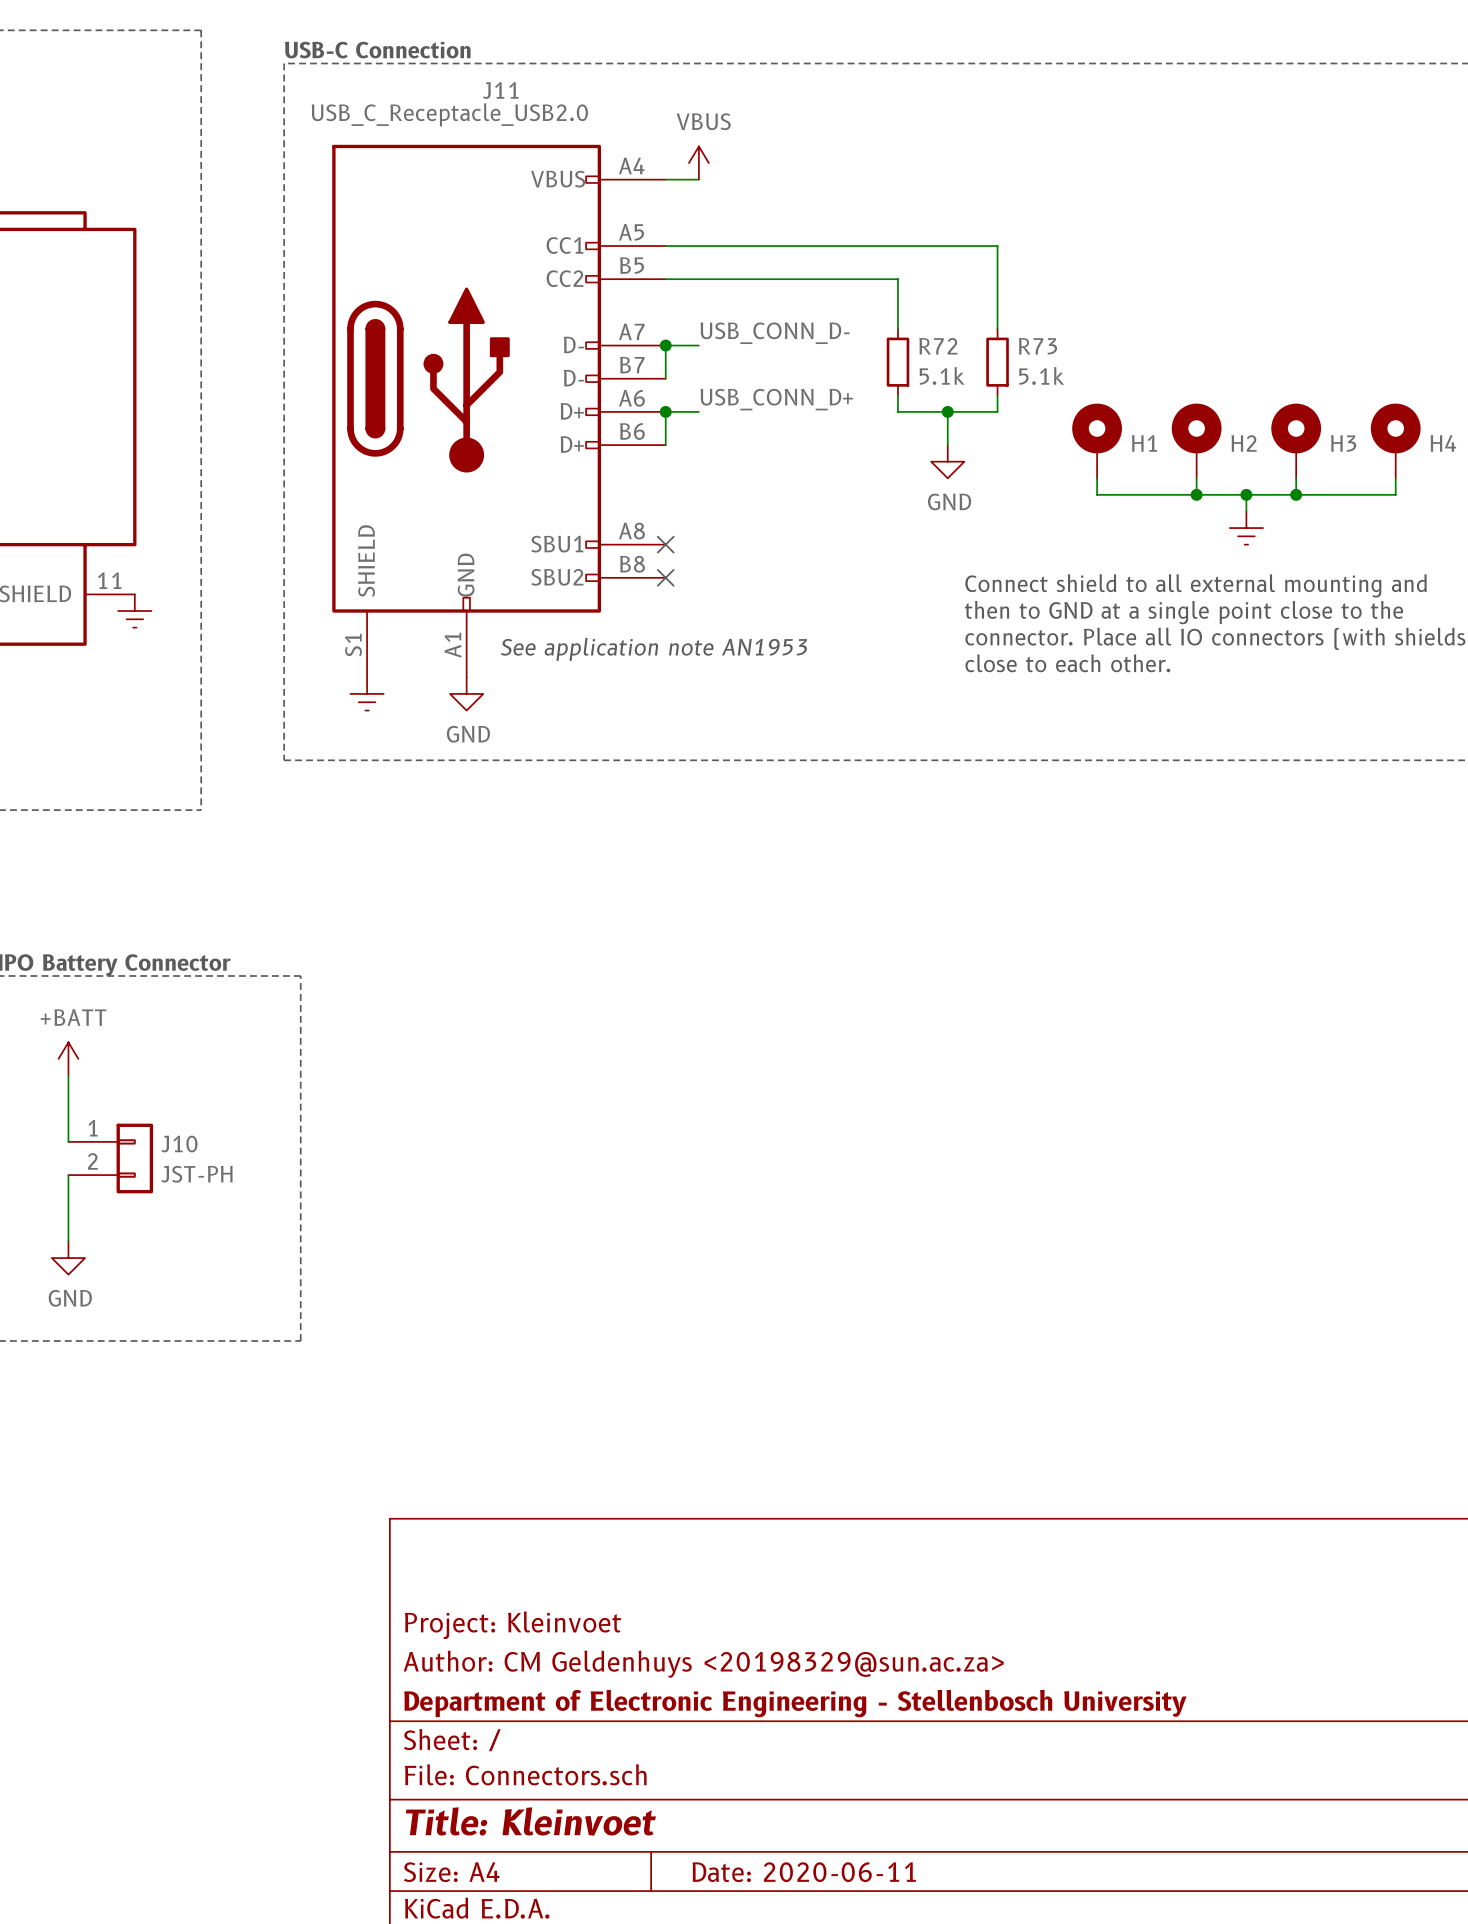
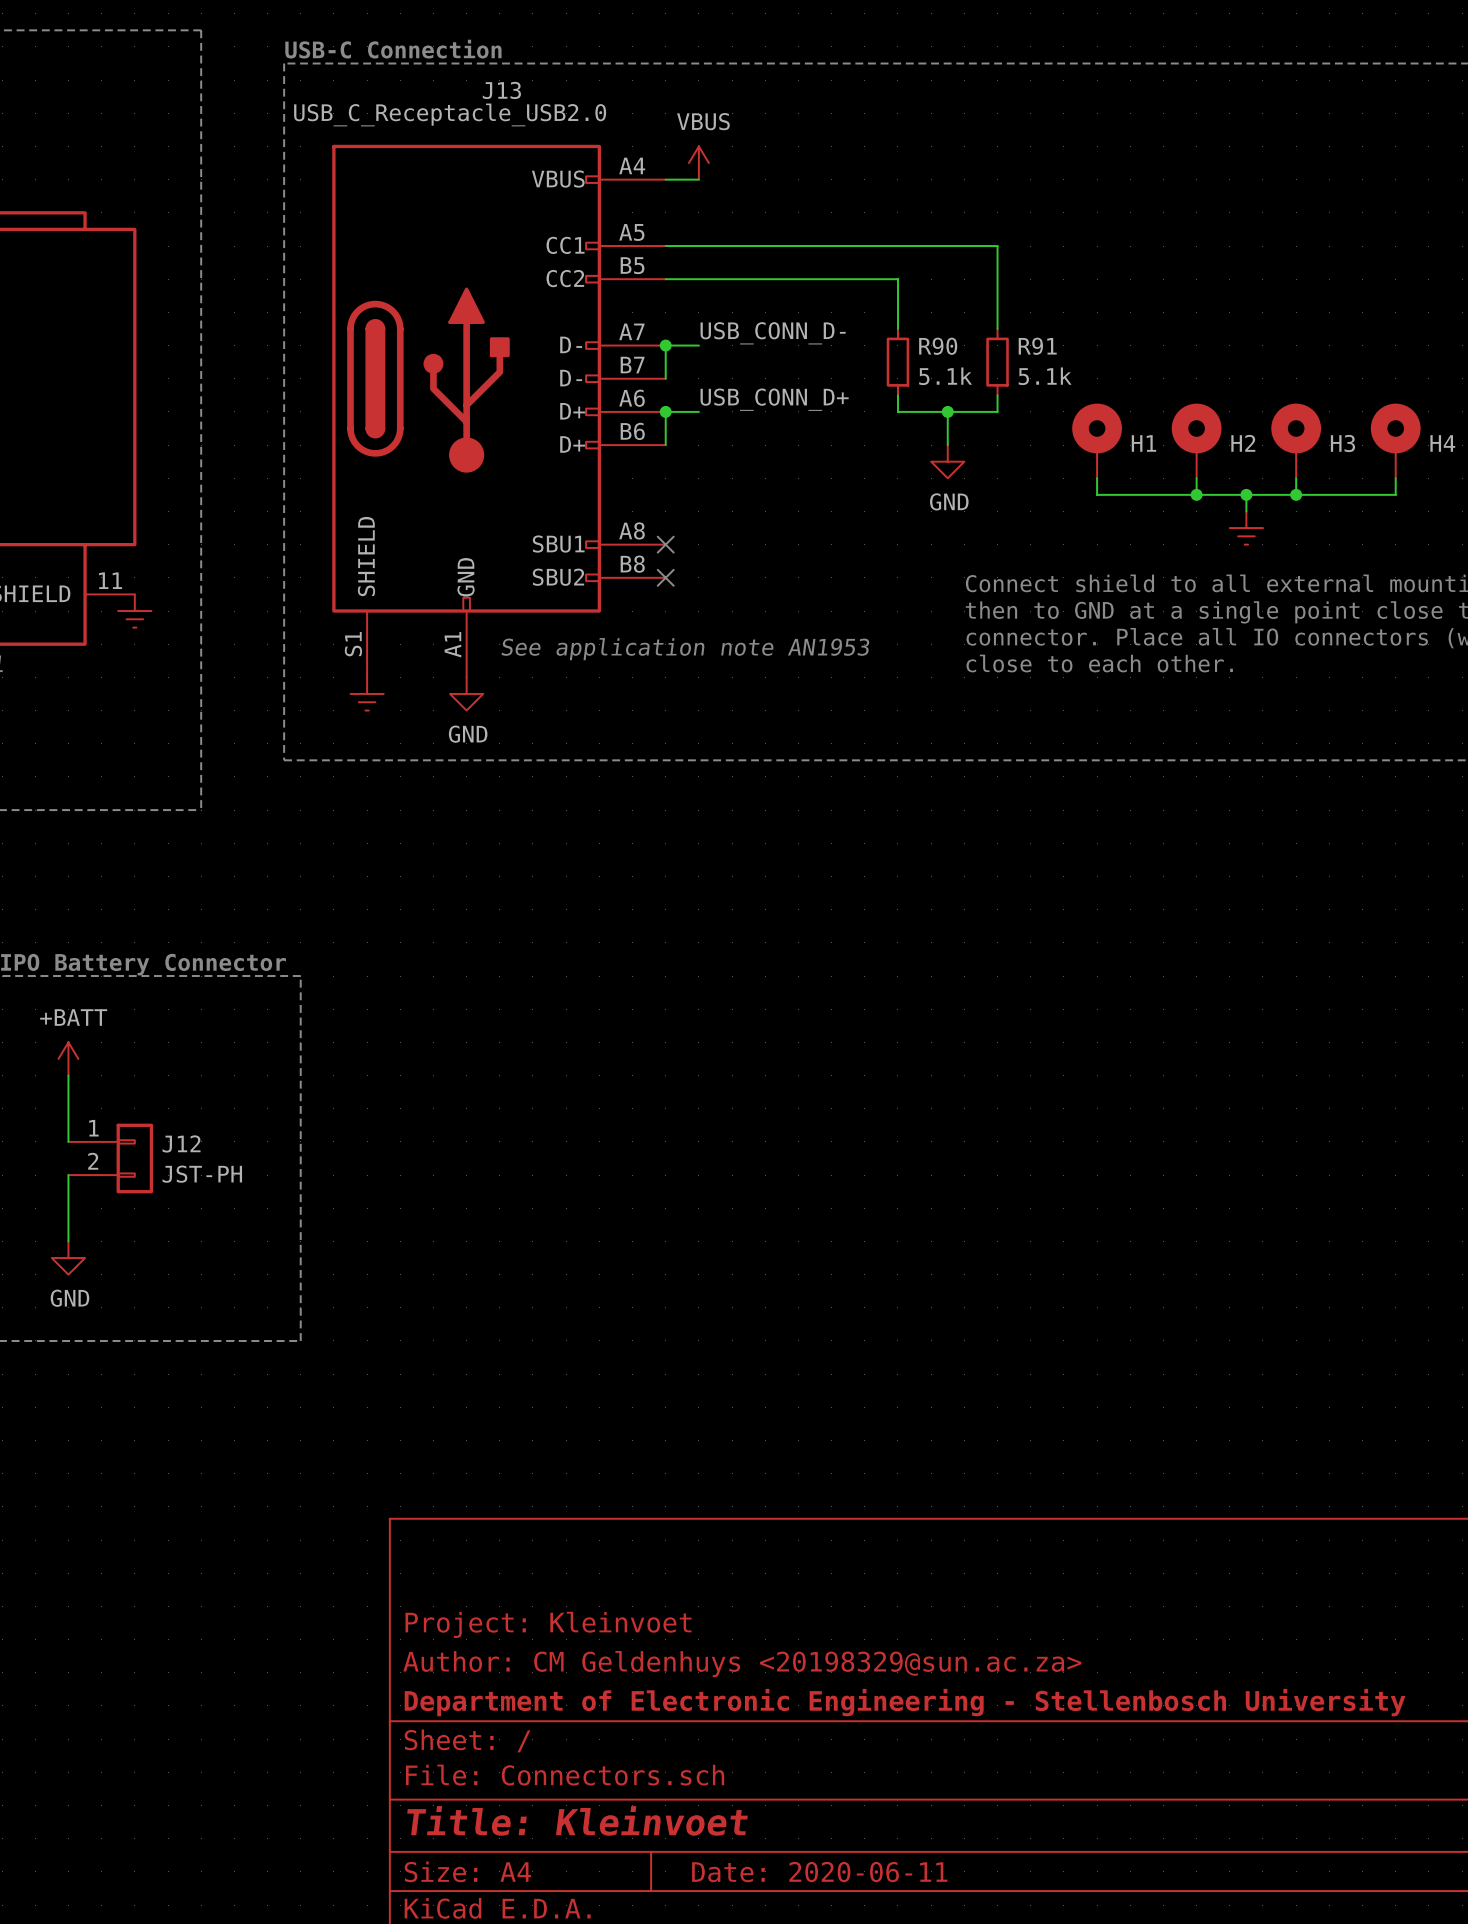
J11 name: J11 (500, 90) -> J13 (501, 90)
R72 name: R72 (938, 346) -> R90 (938, 346)
R73 name: R73 (1037, 346) -> R91 (1037, 346)
J10 name: J10 (179, 1144) -> J12 (181, 1143)

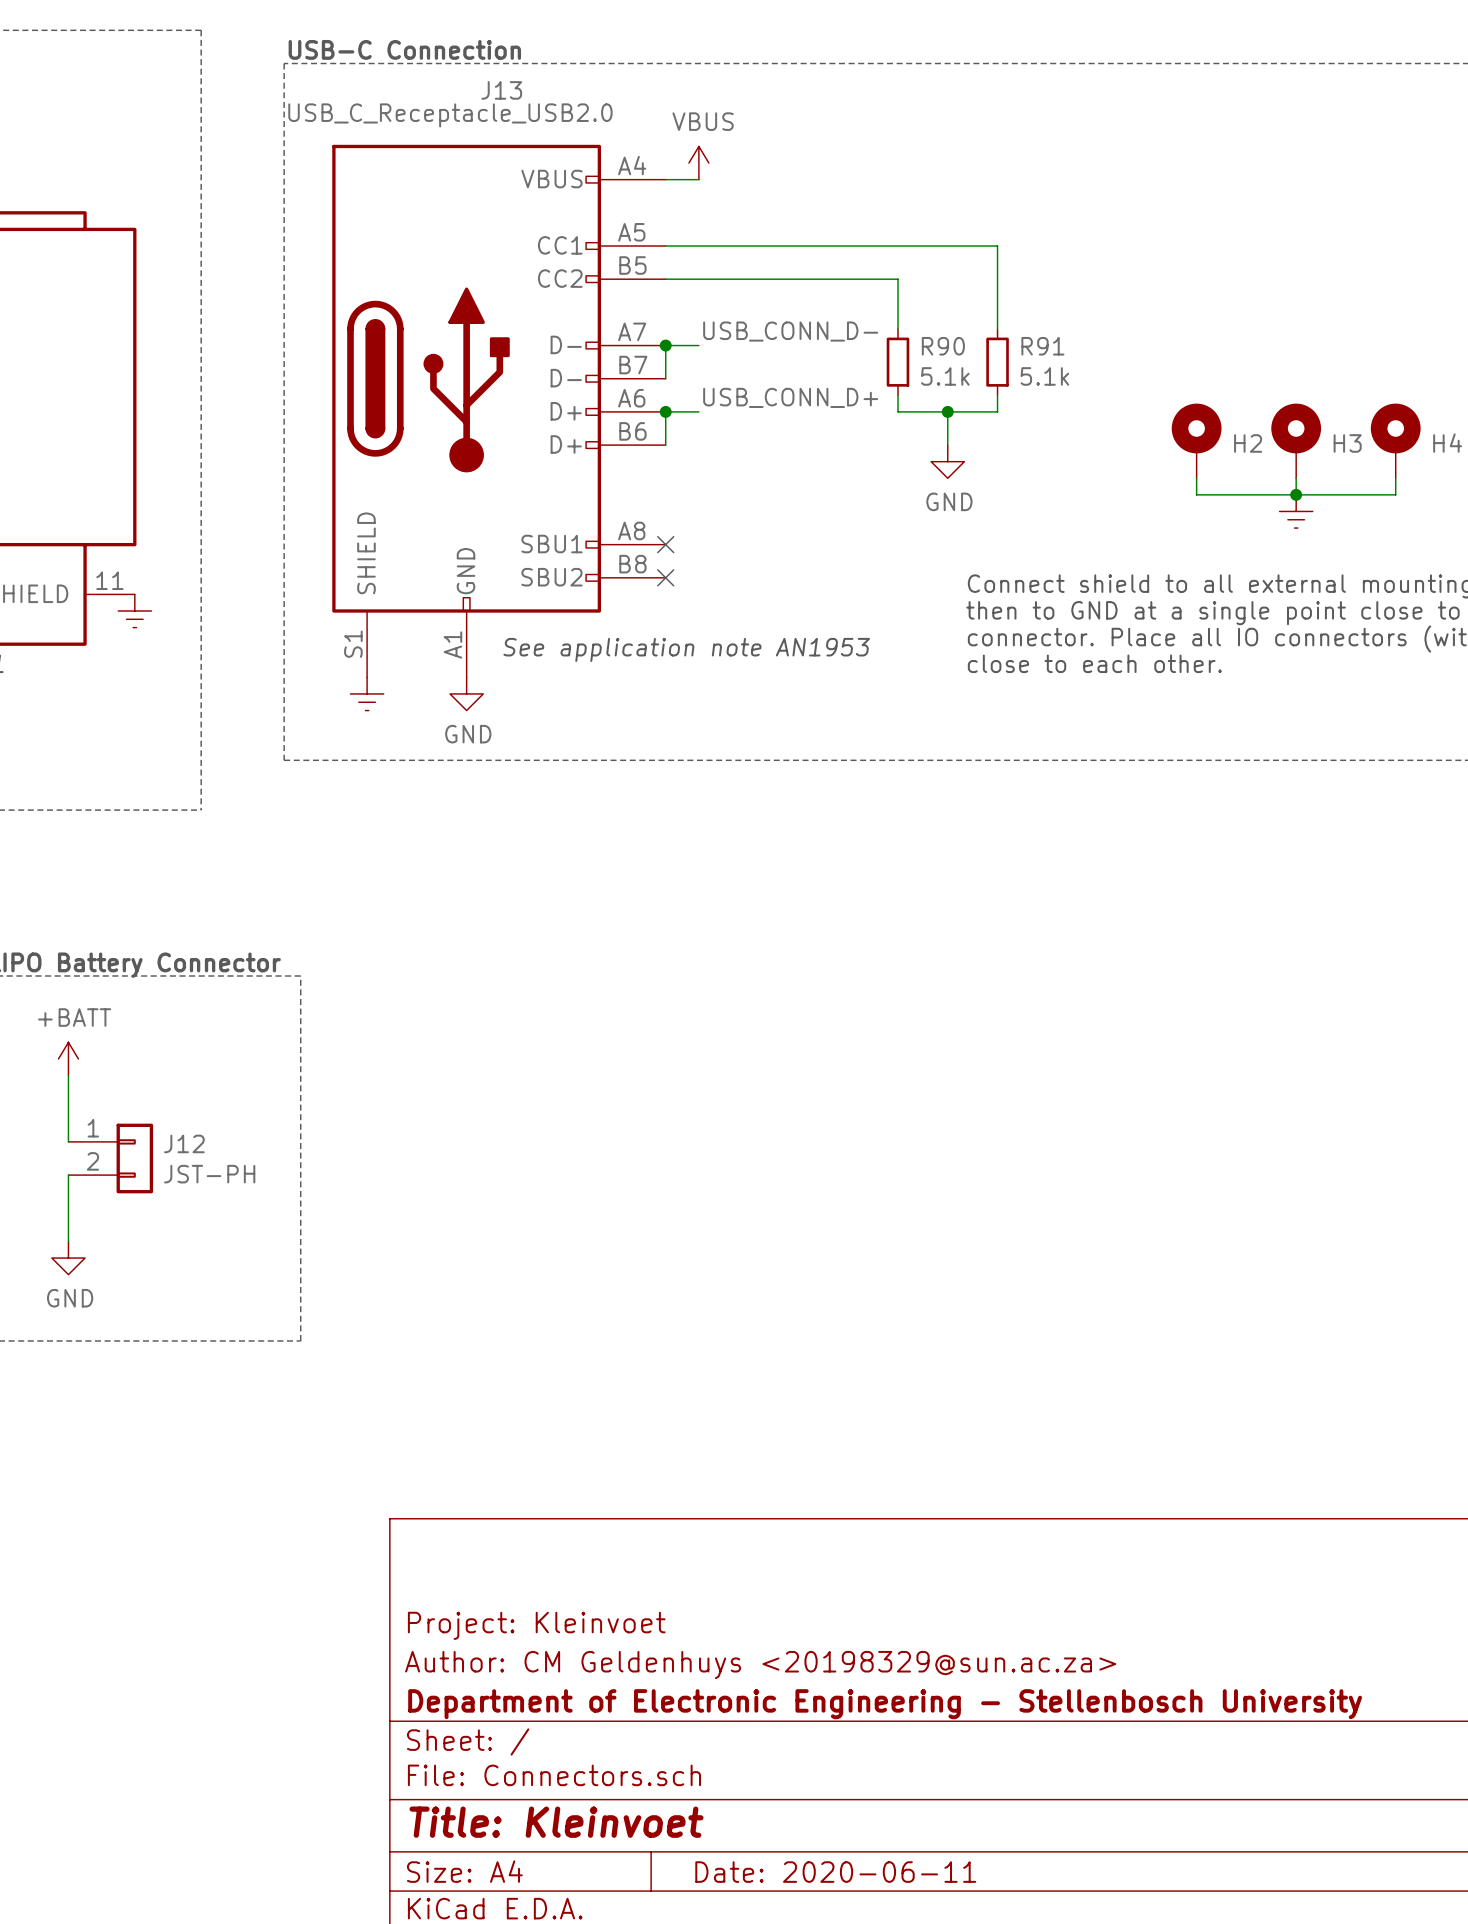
H1: (1097, 440) -> none
wire: (1097, 478) (1097, 494) (1196, 494) -> none
junction: (1196, 494) -> none
wire: (1246, 494) (1246, 511) -> none
junction: (1246, 494) -> none
power symbol position: (1246, 528) -> (1296, 511)

